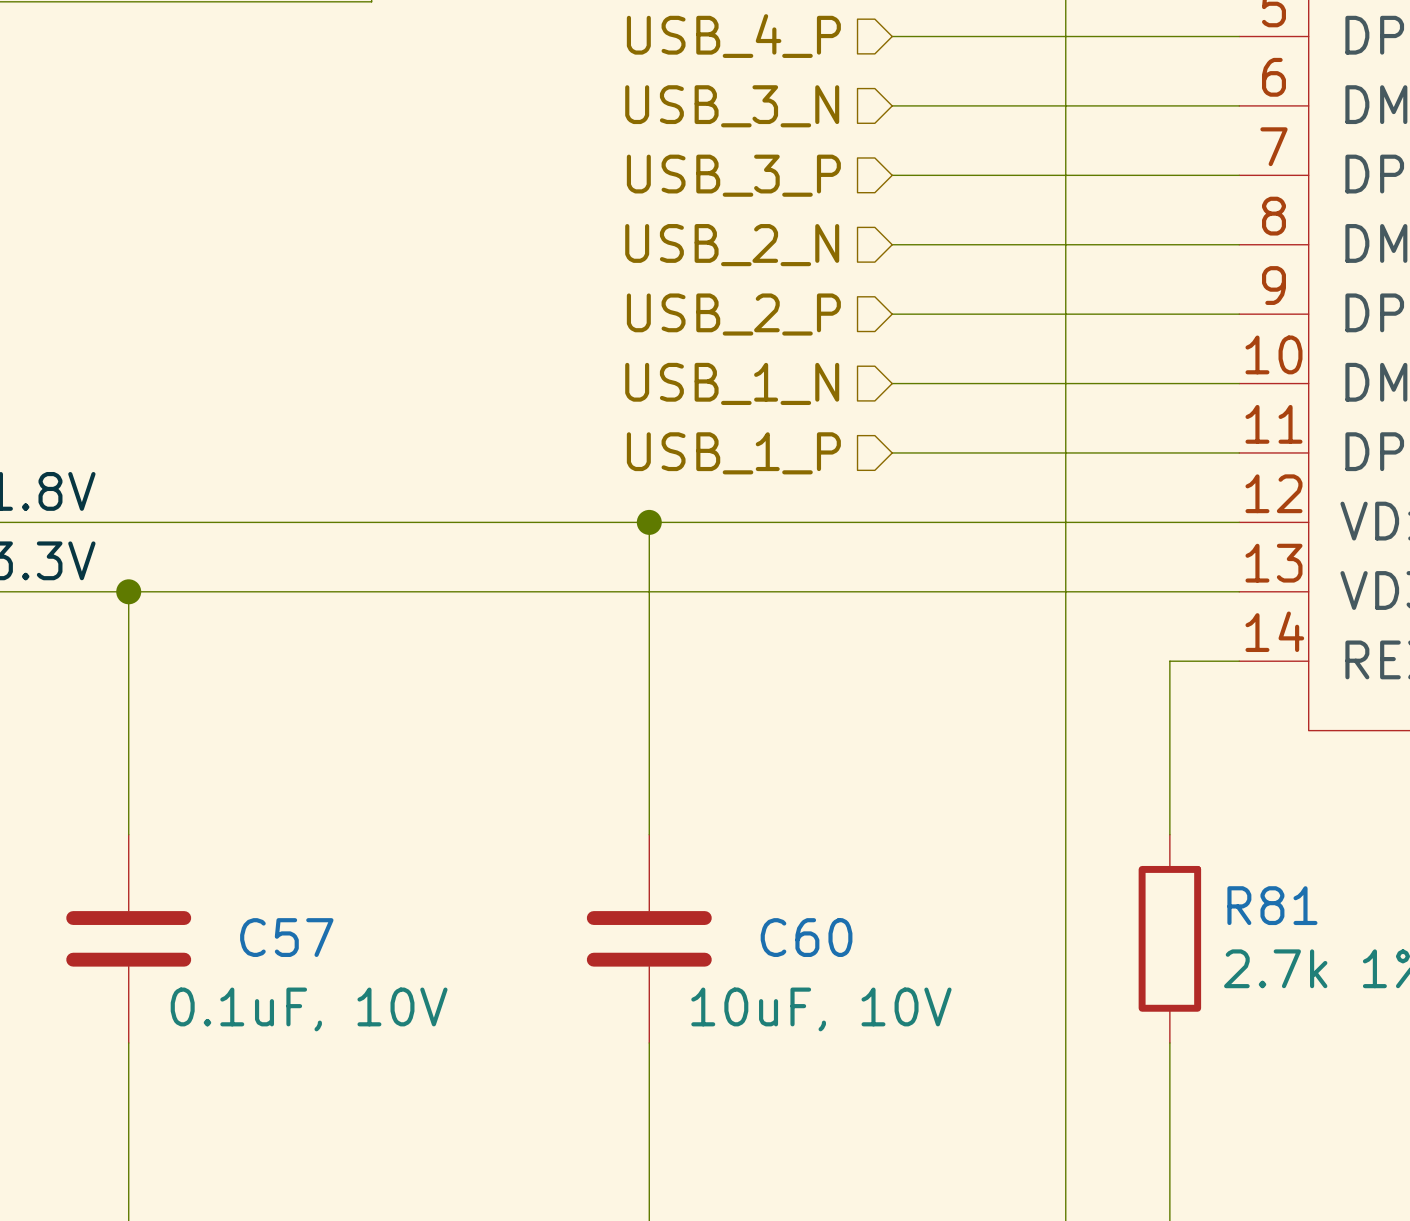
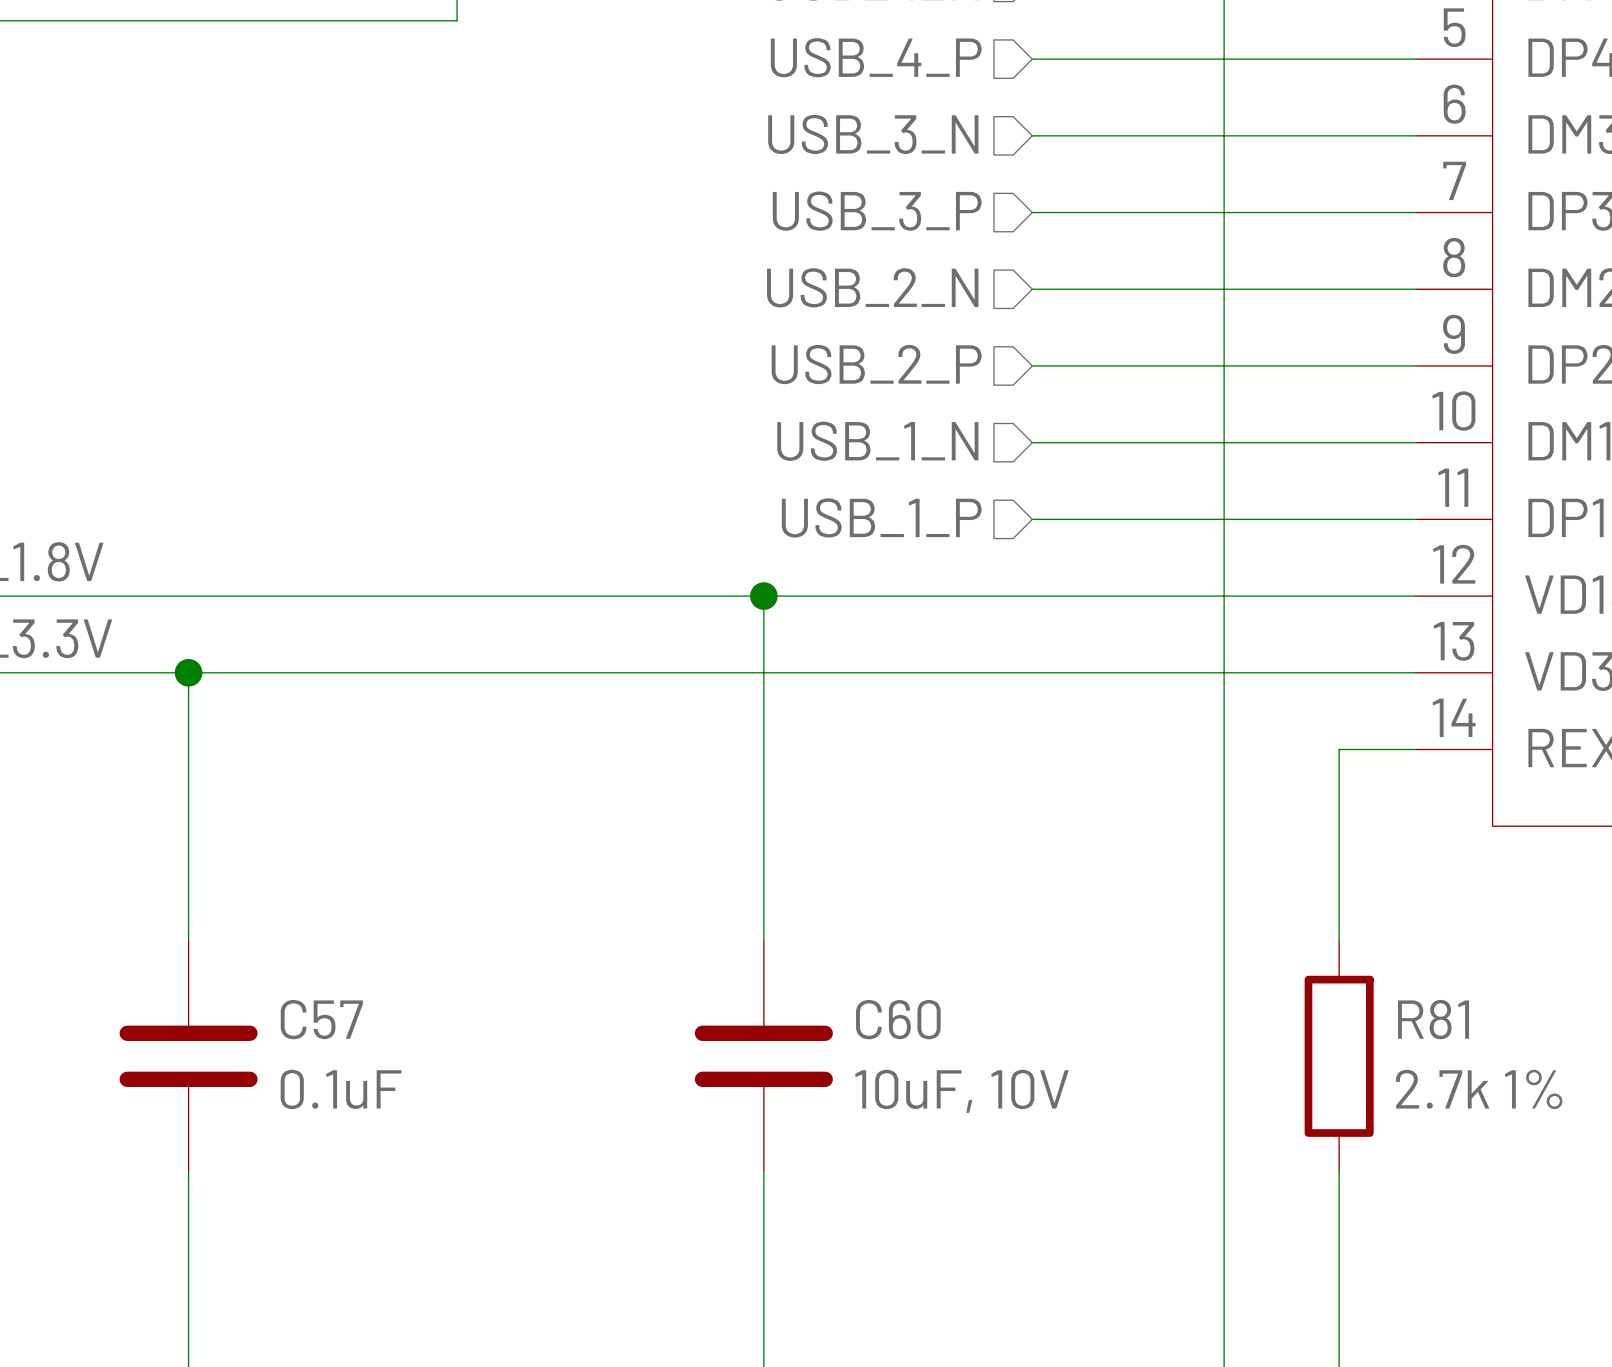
C57 name position: C57 (286, 937) -> C57 (321, 1019)
C60 name position: C60 (806, 937) -> C60 (898, 1019)
C57 value: 0.1uF, 10V (309, 1009) -> 0.1uF (341, 1089)
C60 value position: 10uF, 10V (821, 1009) -> 10uF, 10V (961, 1091)

